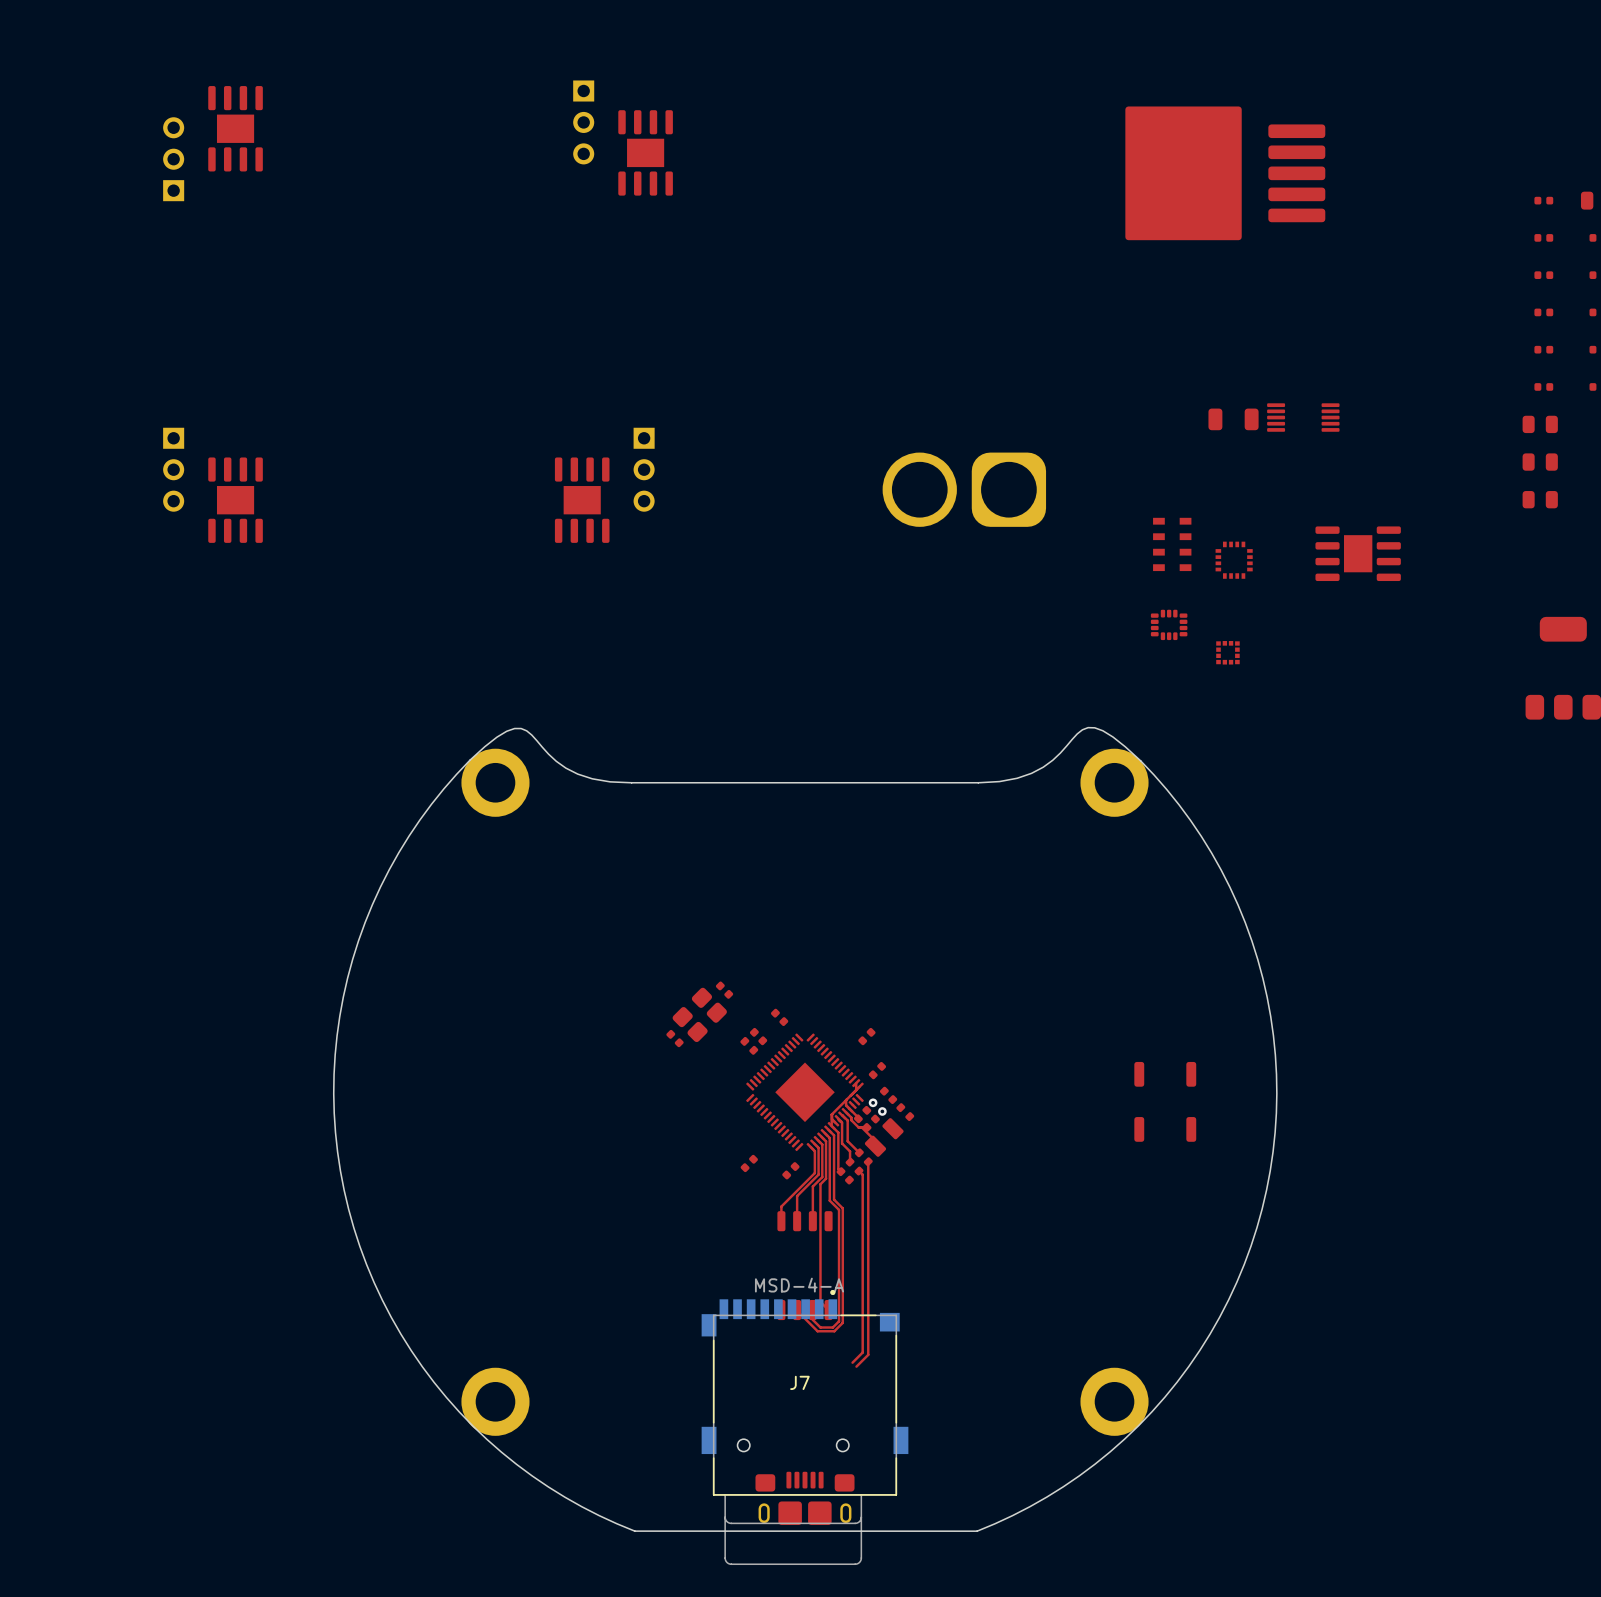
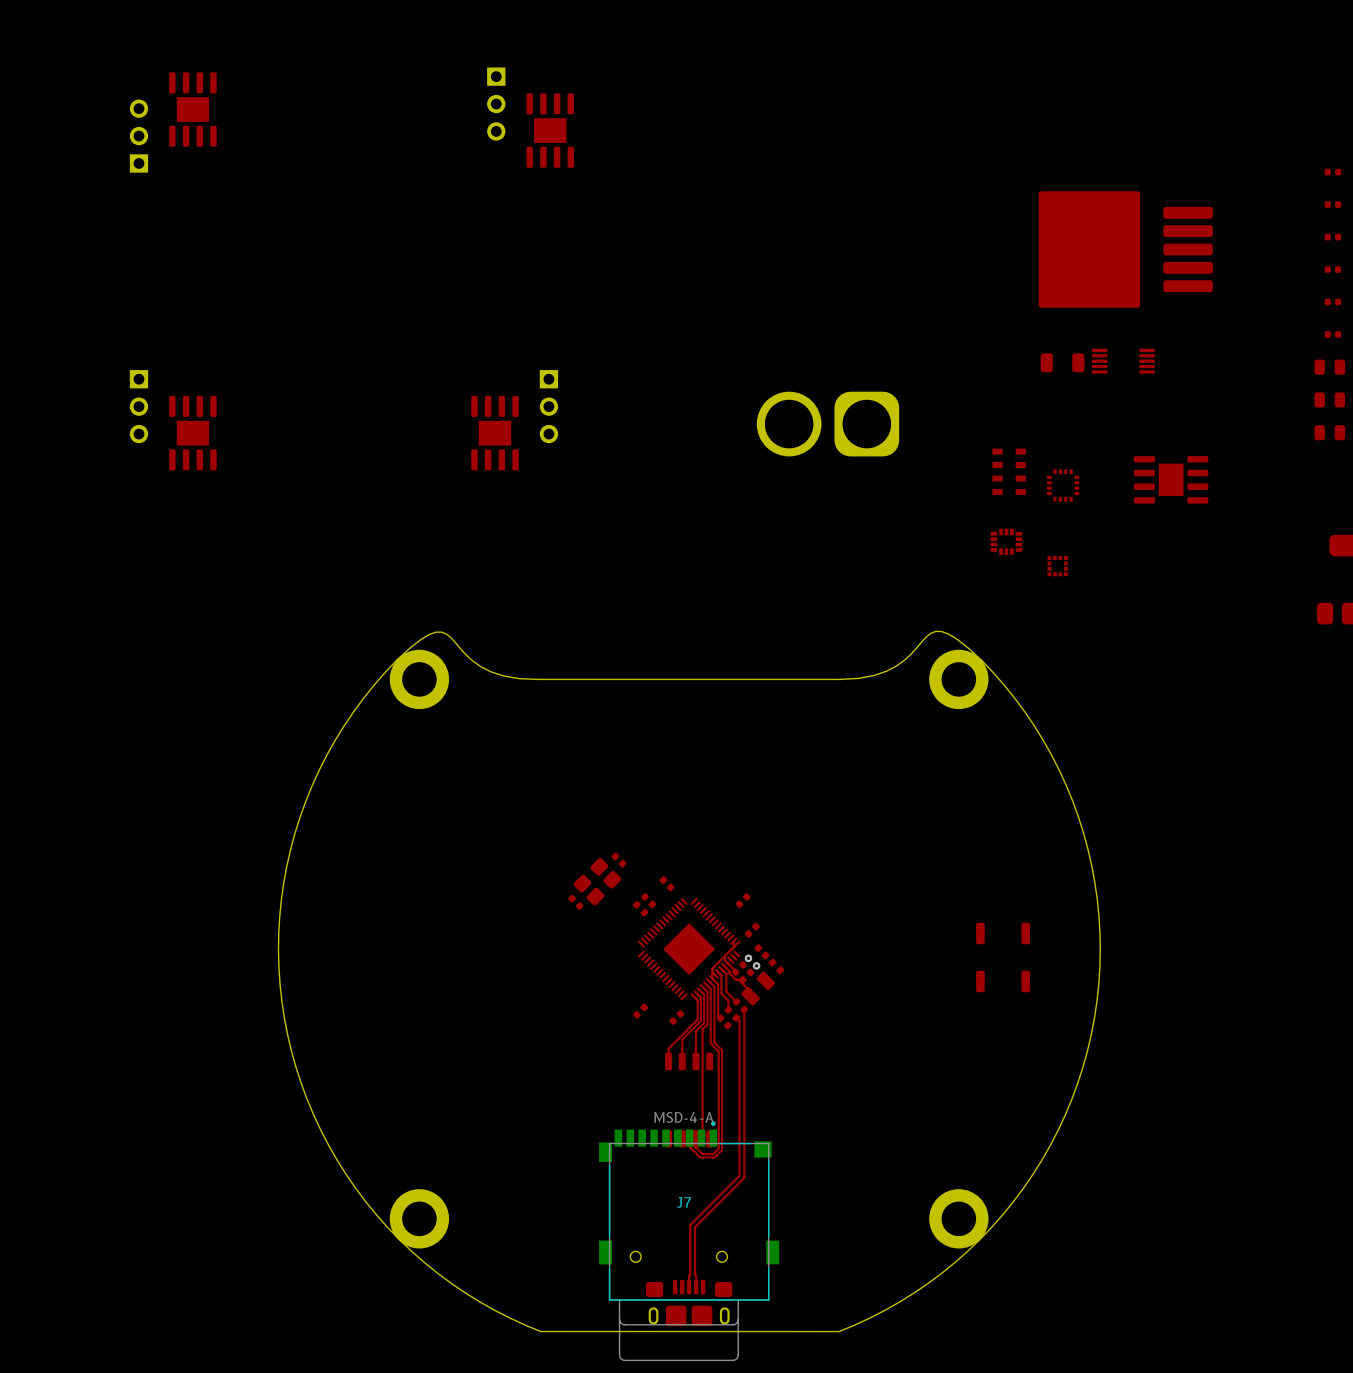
part position: (1225, 173) -> (1125, 249)
top track: none -> (730, 1184) (690, 1225) (689, 1287)
top track: none -> (734, 1188) (695, 1227) (696, 1287)

